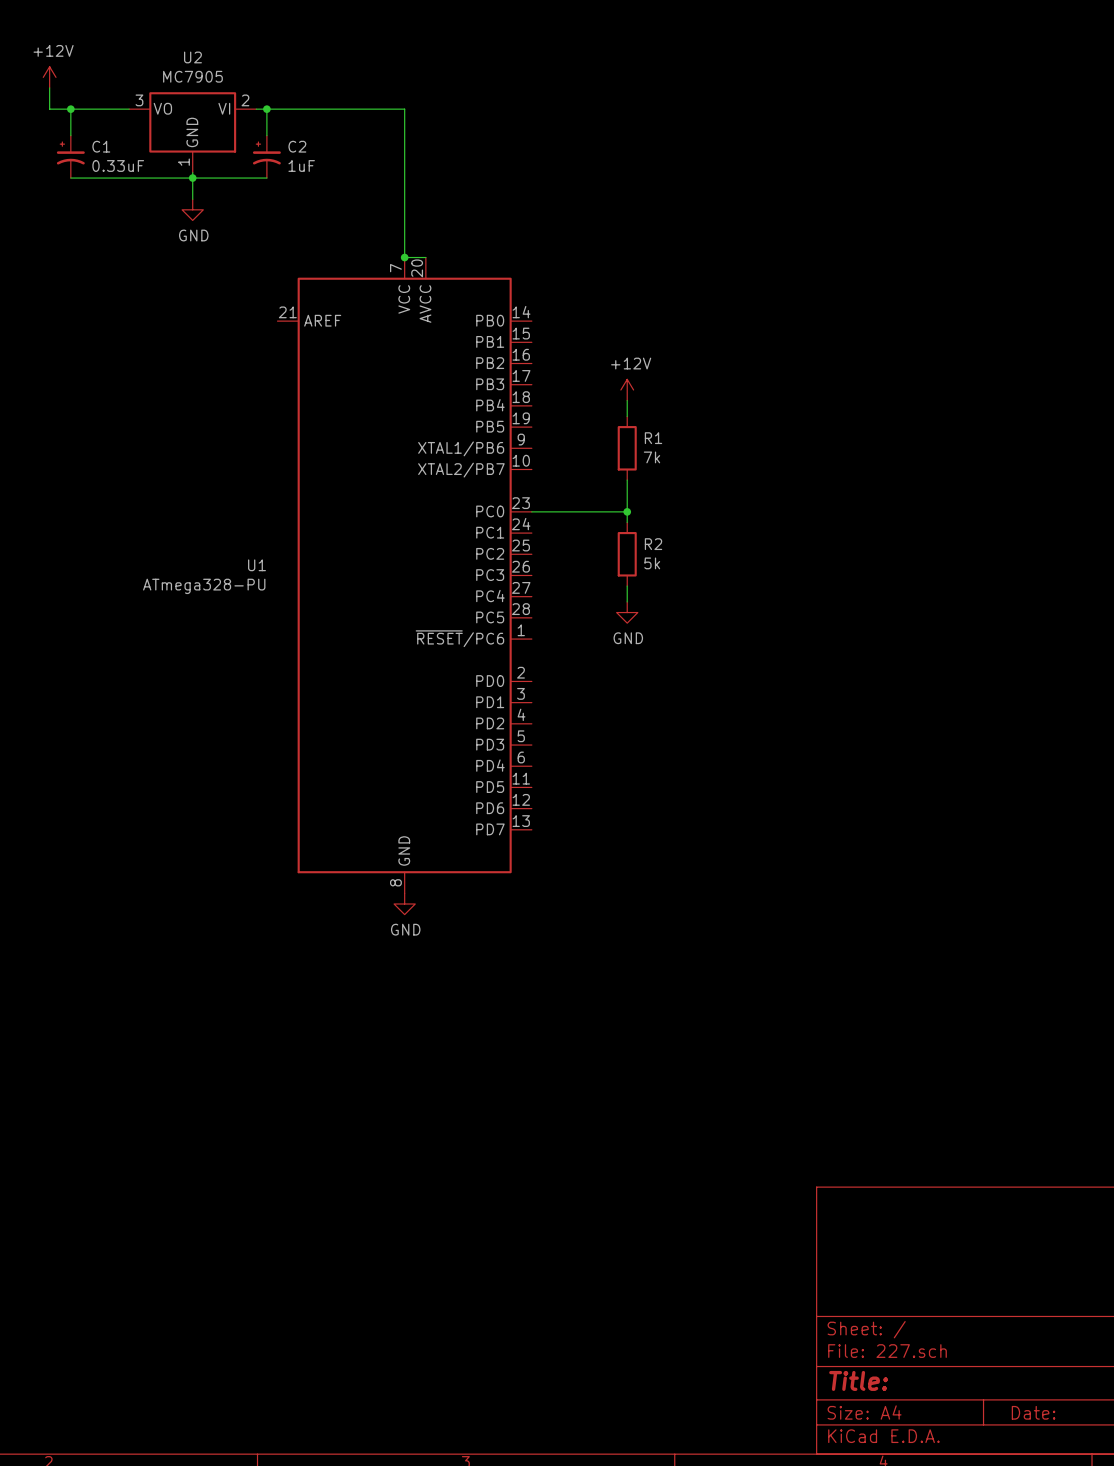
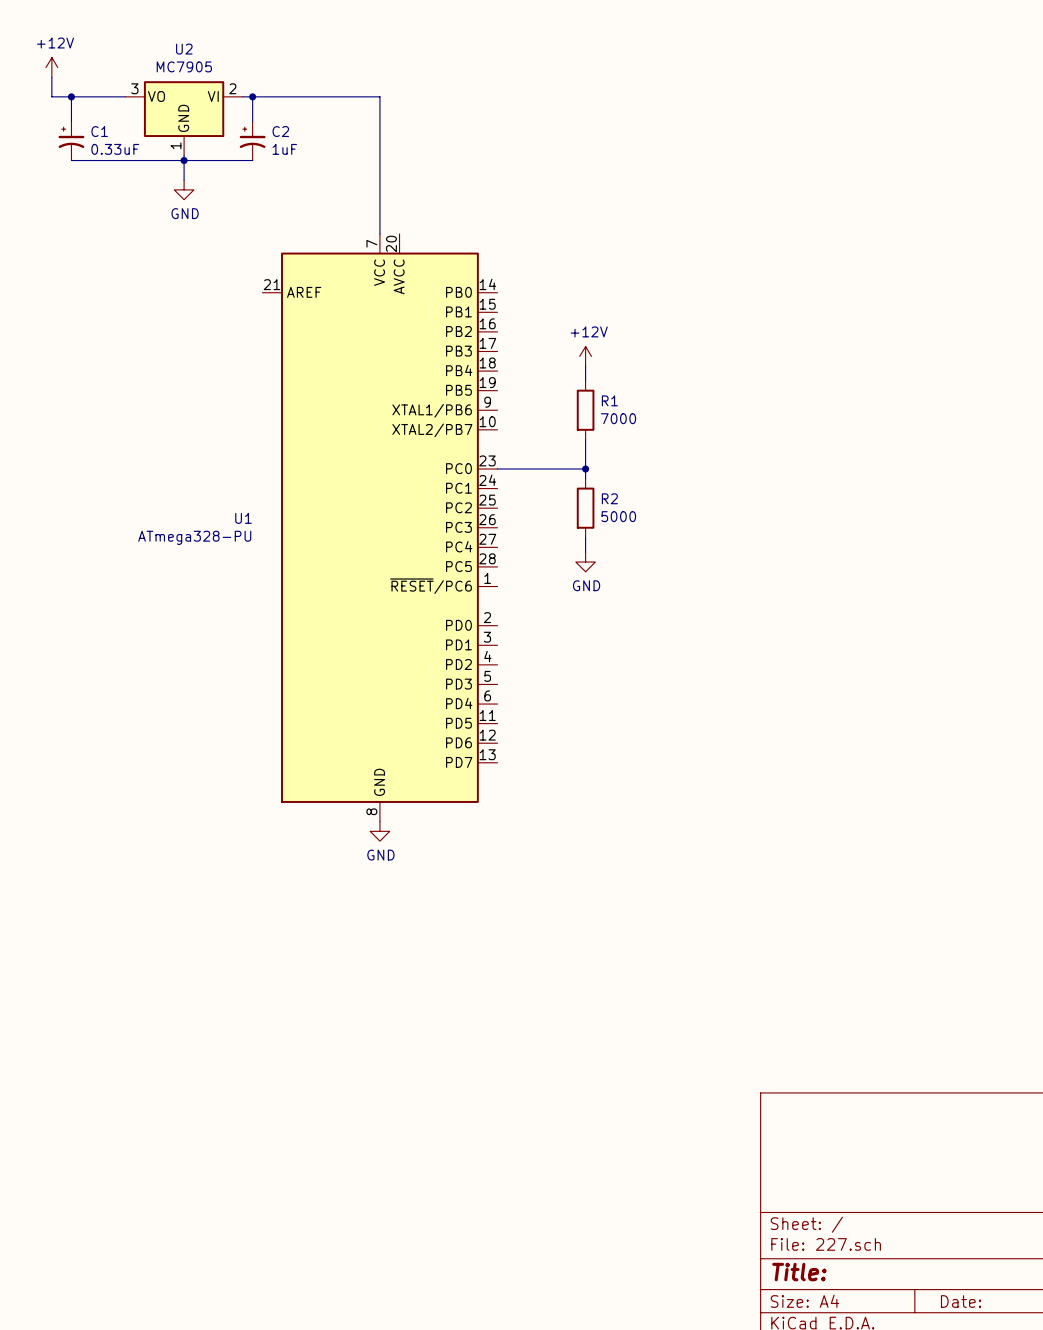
wire: (404, 257) (425, 257) -> none
junction: (404, 257) -> none
R1 value: 7k (651, 457) -> 7000 (618, 418)
R2 value: 5k (652, 563) -> 5000 (618, 516)

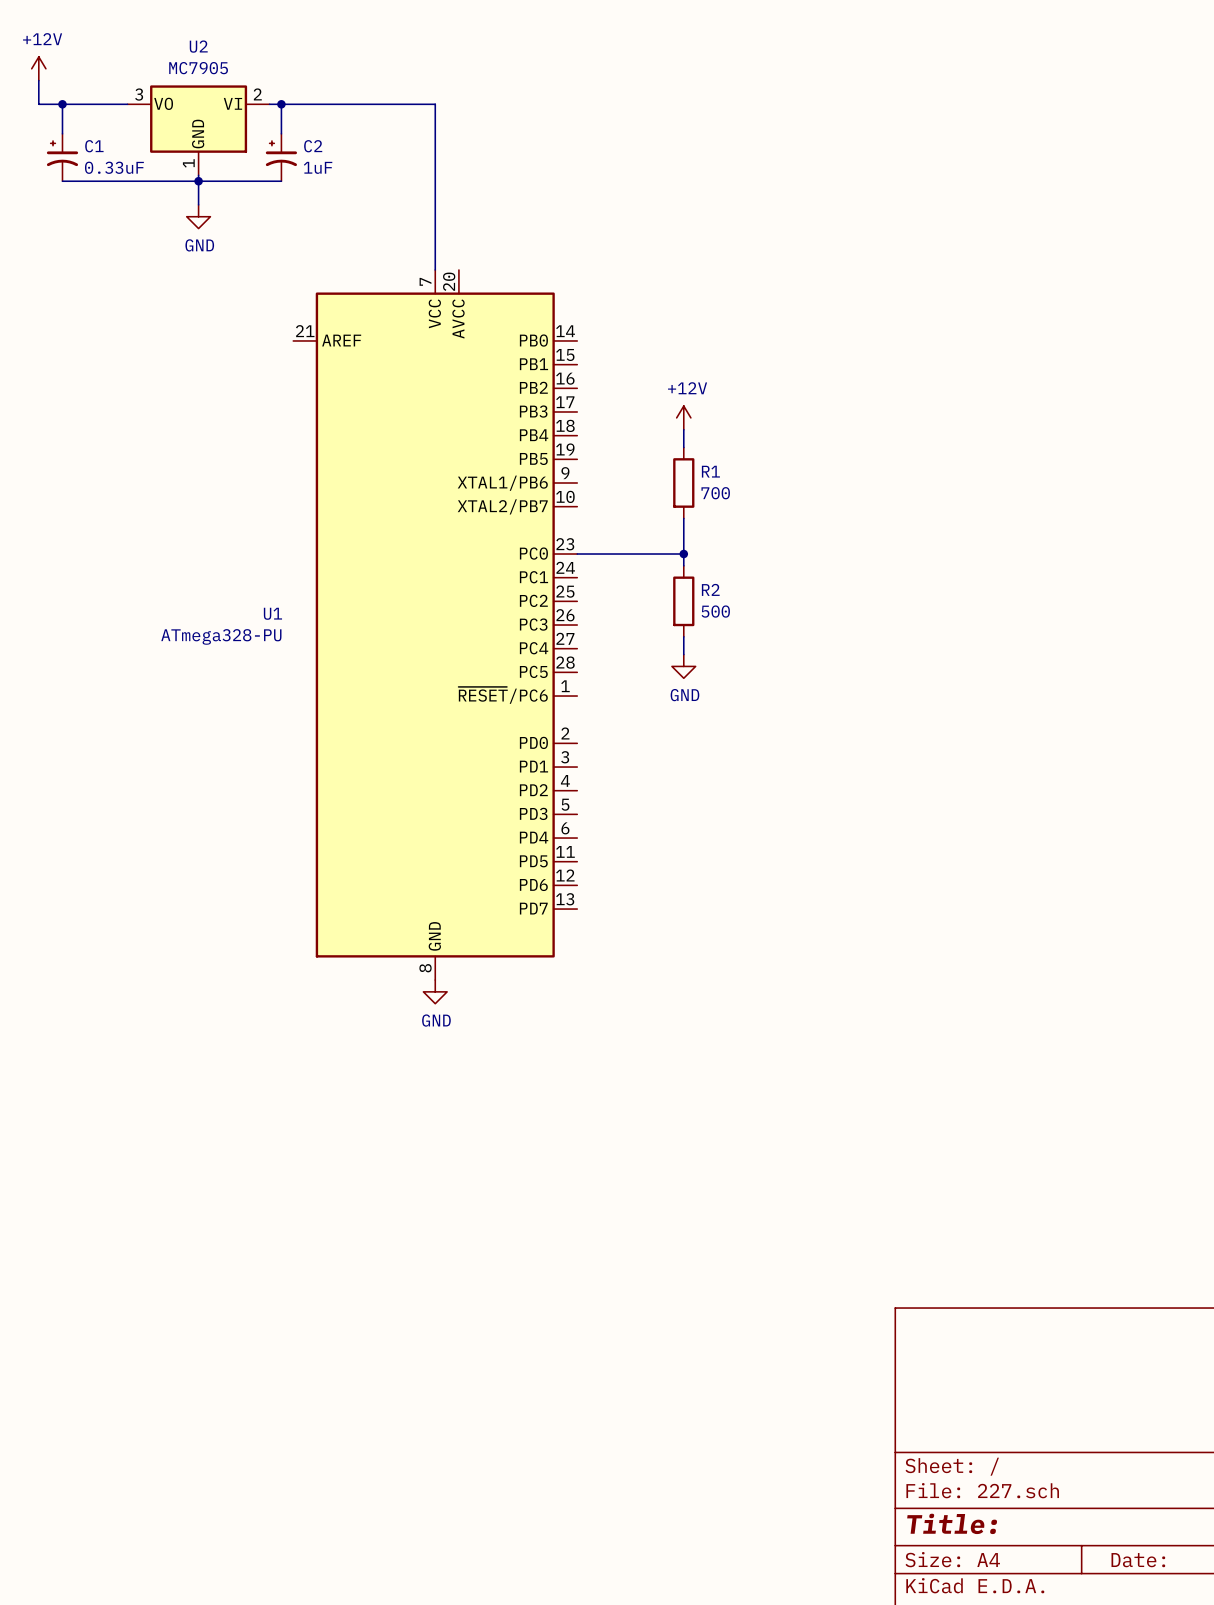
R1 value: 7000 (618, 418) -> 700 (715, 493)
R2 value: 5000 (618, 516) -> 500 (715, 611)

